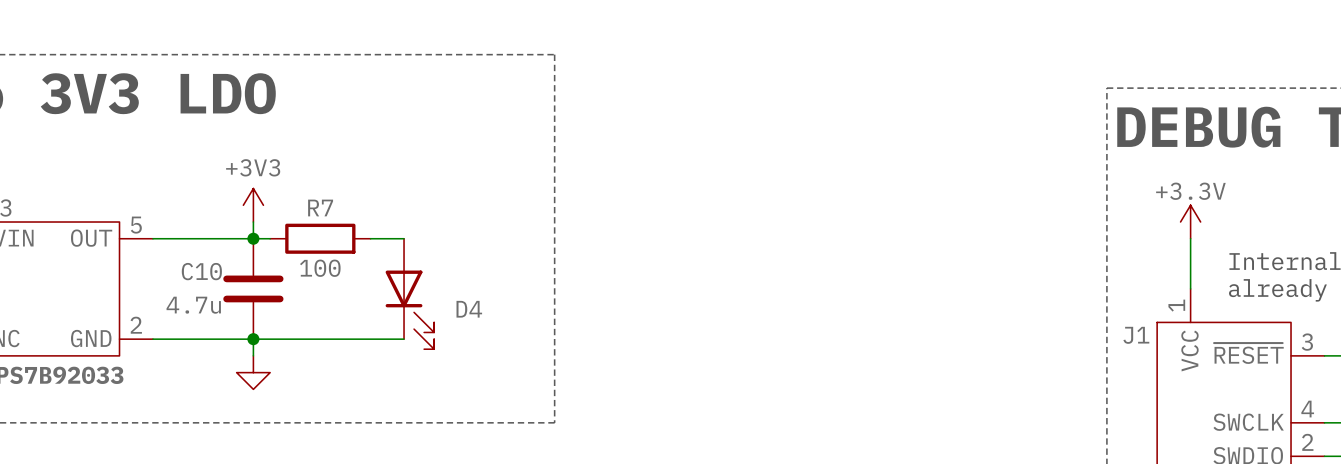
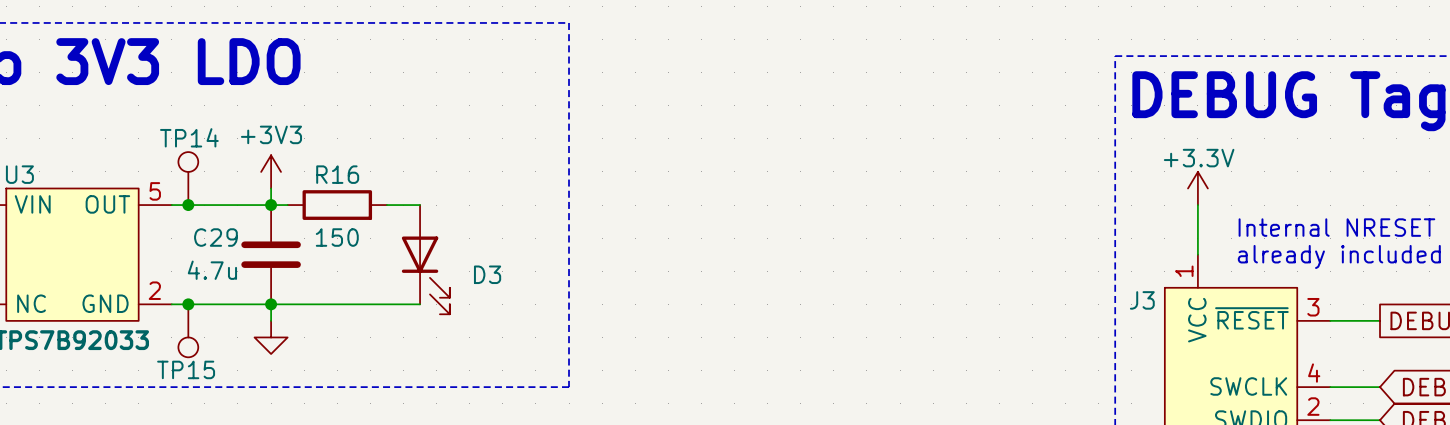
R7 name: R7 (320, 207) -> R16 (337, 174)
TP14: none -> (188, 178)
junction: none -> (188, 205)
R7 value: 100 (320, 268) -> 150 (337, 237)
C10 name: C10 (201, 271) -> C29 (215, 237)
D4 name: D4 (469, 309) -> D3 (487, 274)
J1 name: J1 (1136, 335) -> J3 (1142, 300)
junction: none -> (188, 304)
TP15: none -> (188, 330)

